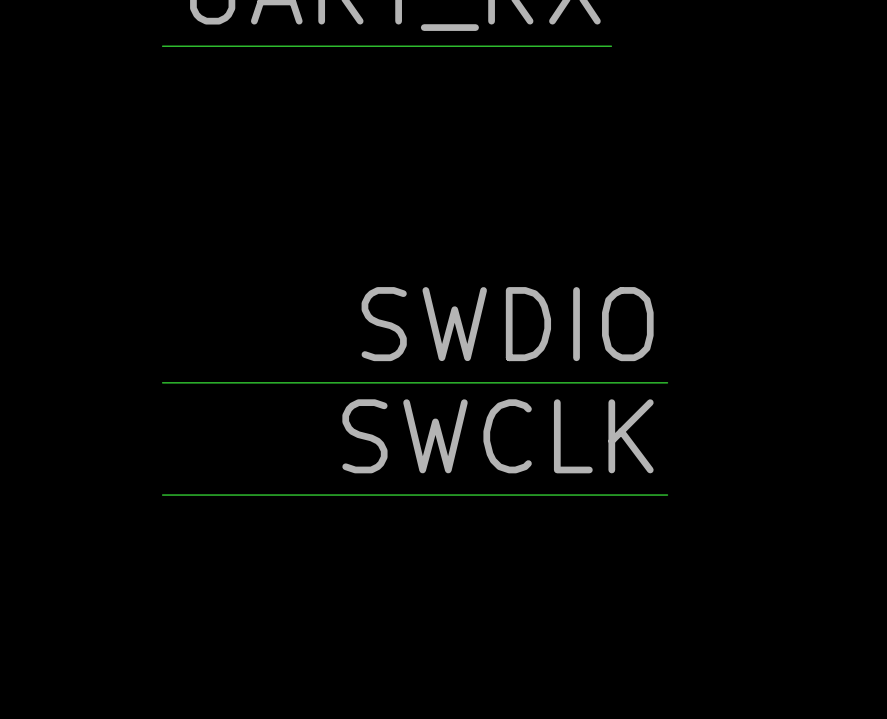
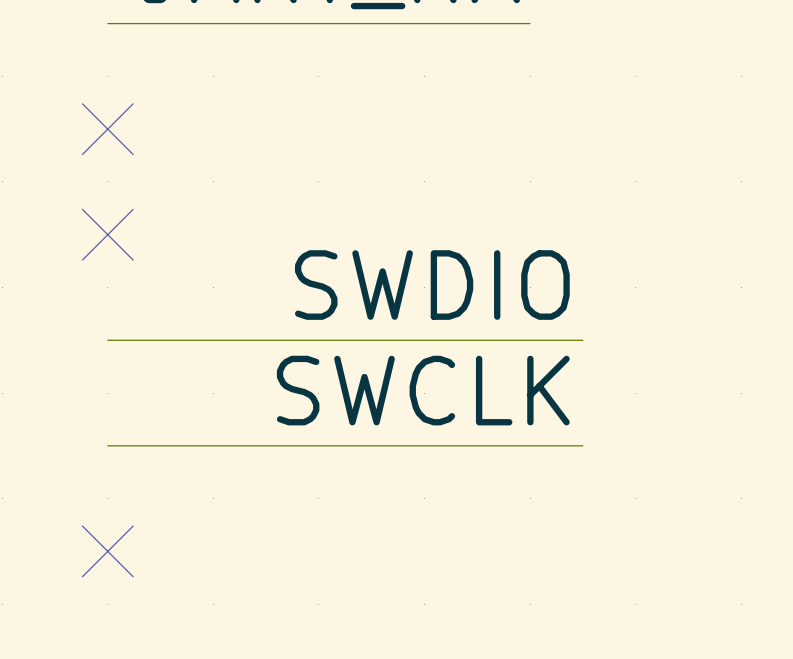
no-connect mark: none -> (107, 129)
no-connect mark: none -> (107, 234)
no-connect mark: none -> (107, 551)

